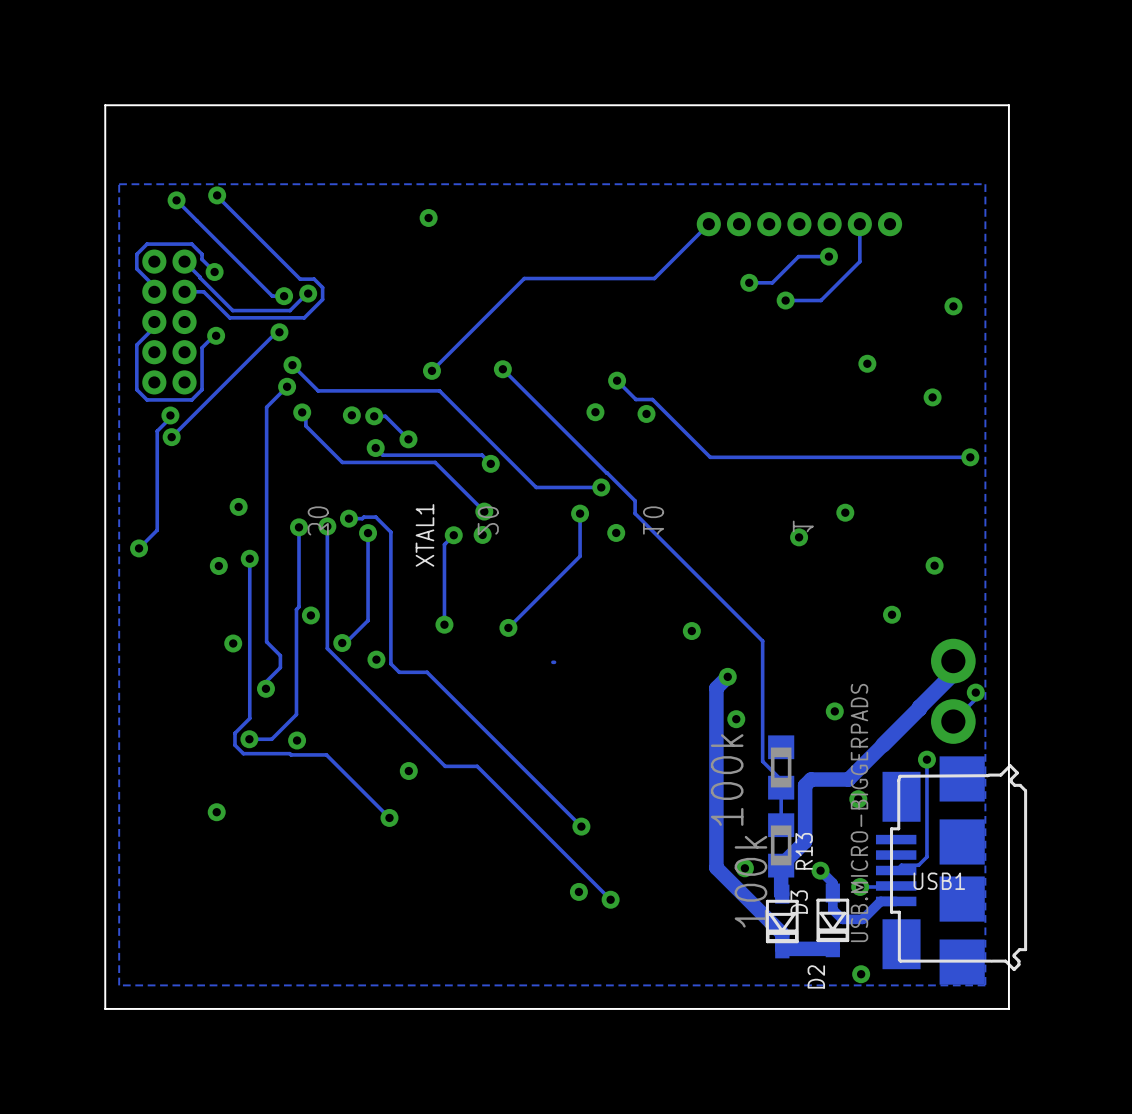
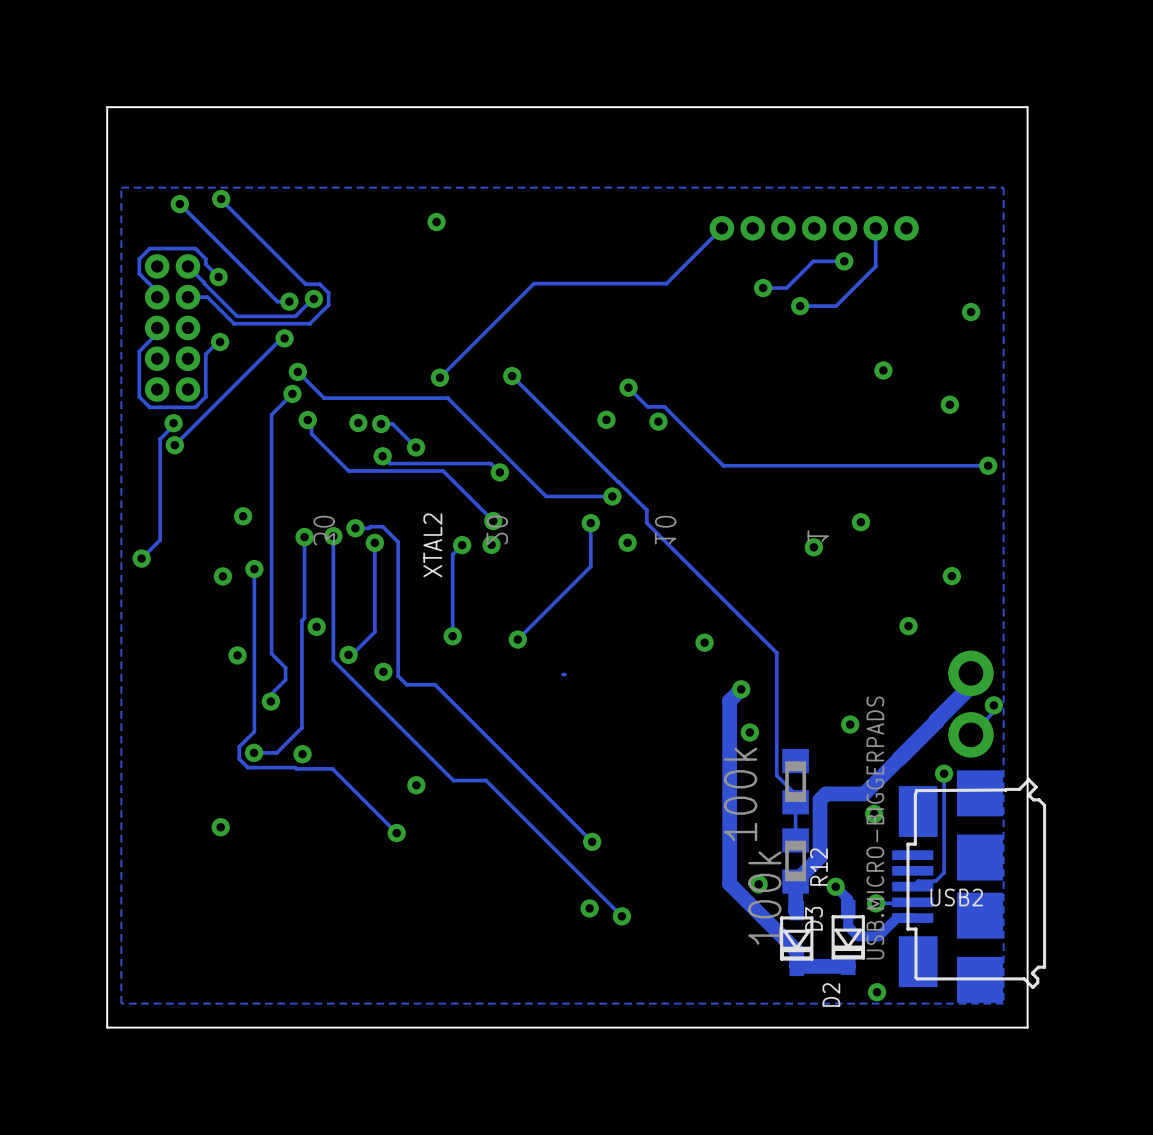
XTAL1 name: XTAL1 (424, 535) -> XTAL2 (432, 545)
R13 name: R13 (804, 851) -> R12 (818, 867)
USB1 name: USB1 (939, 881) -> USB2 (956, 897)

